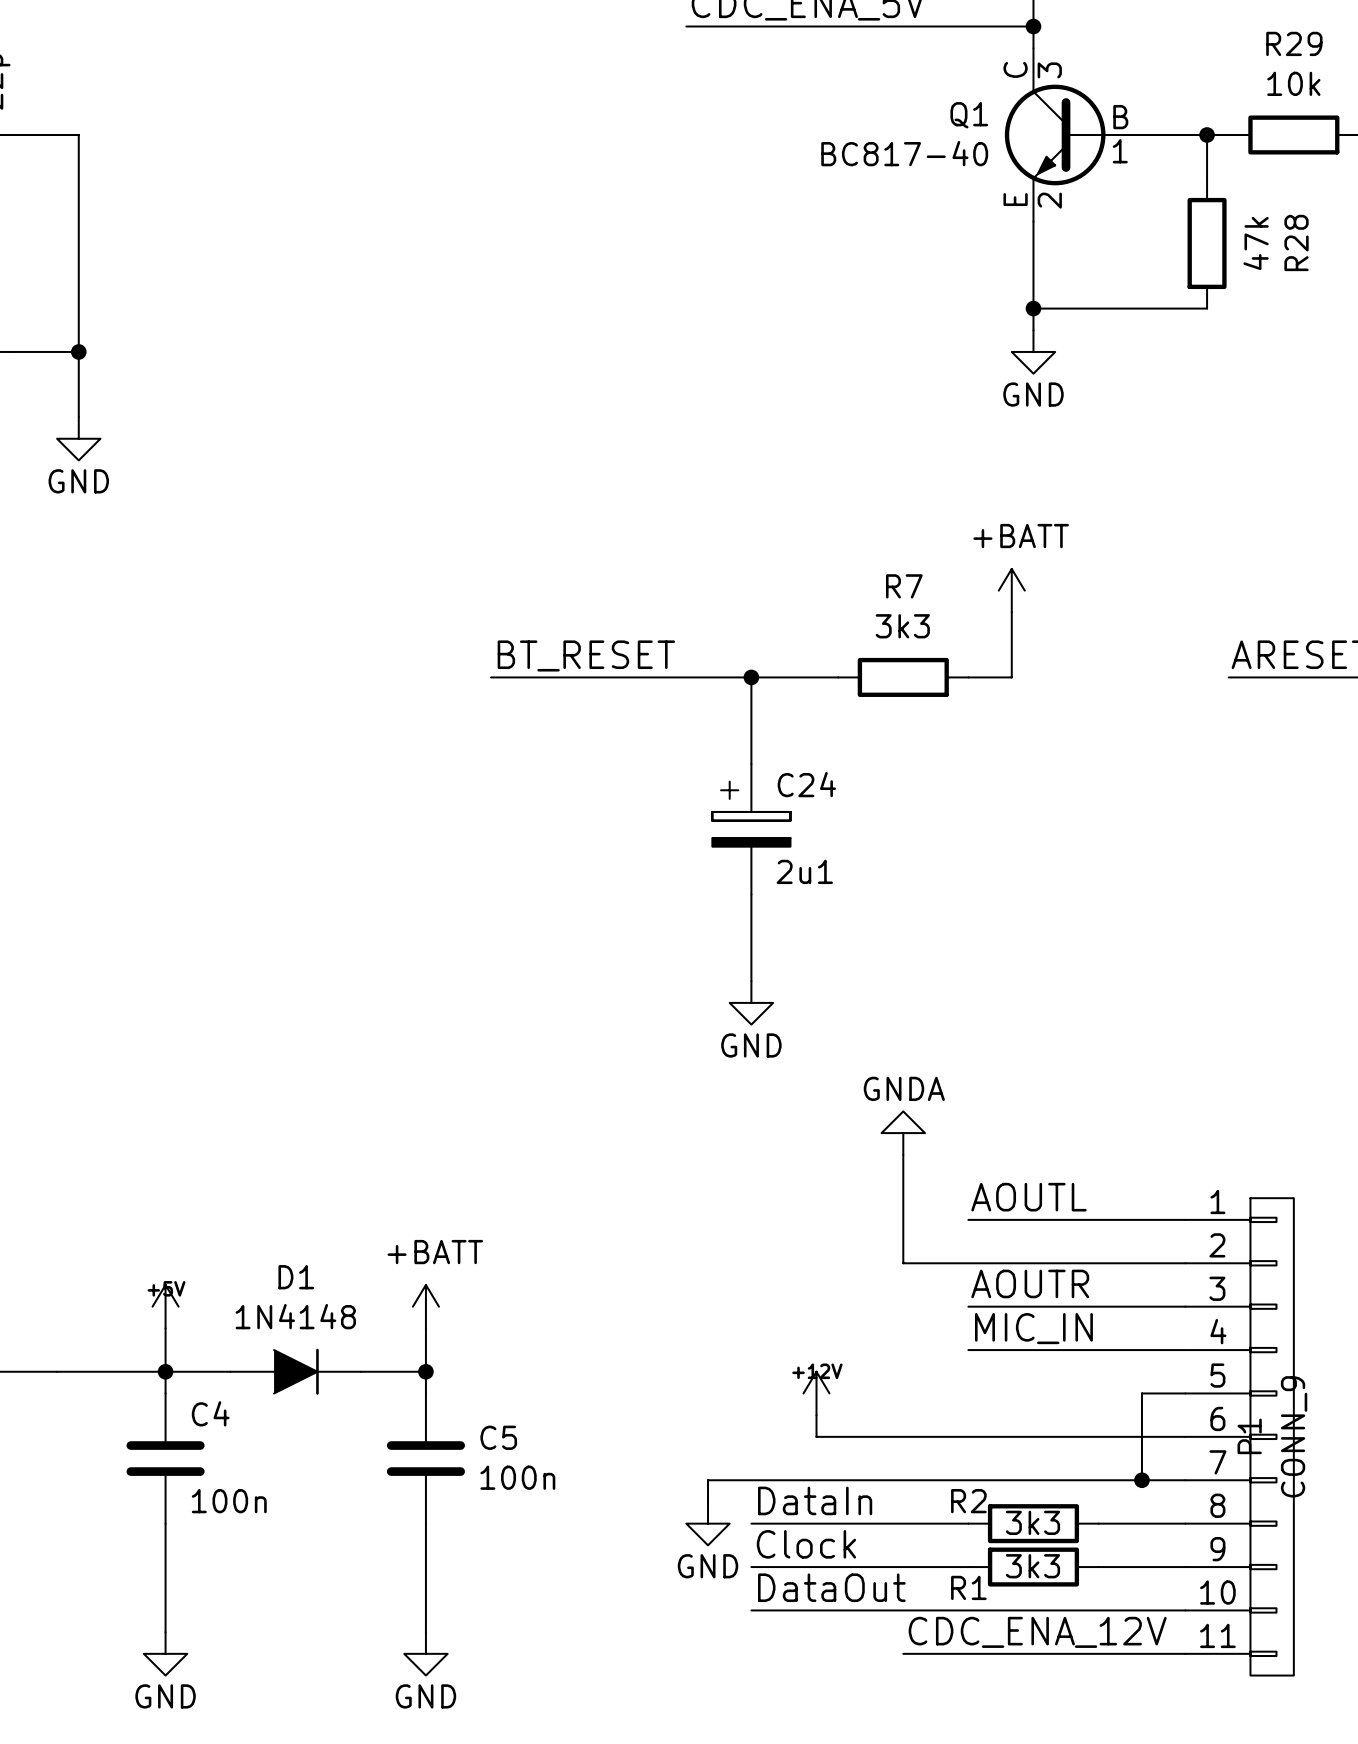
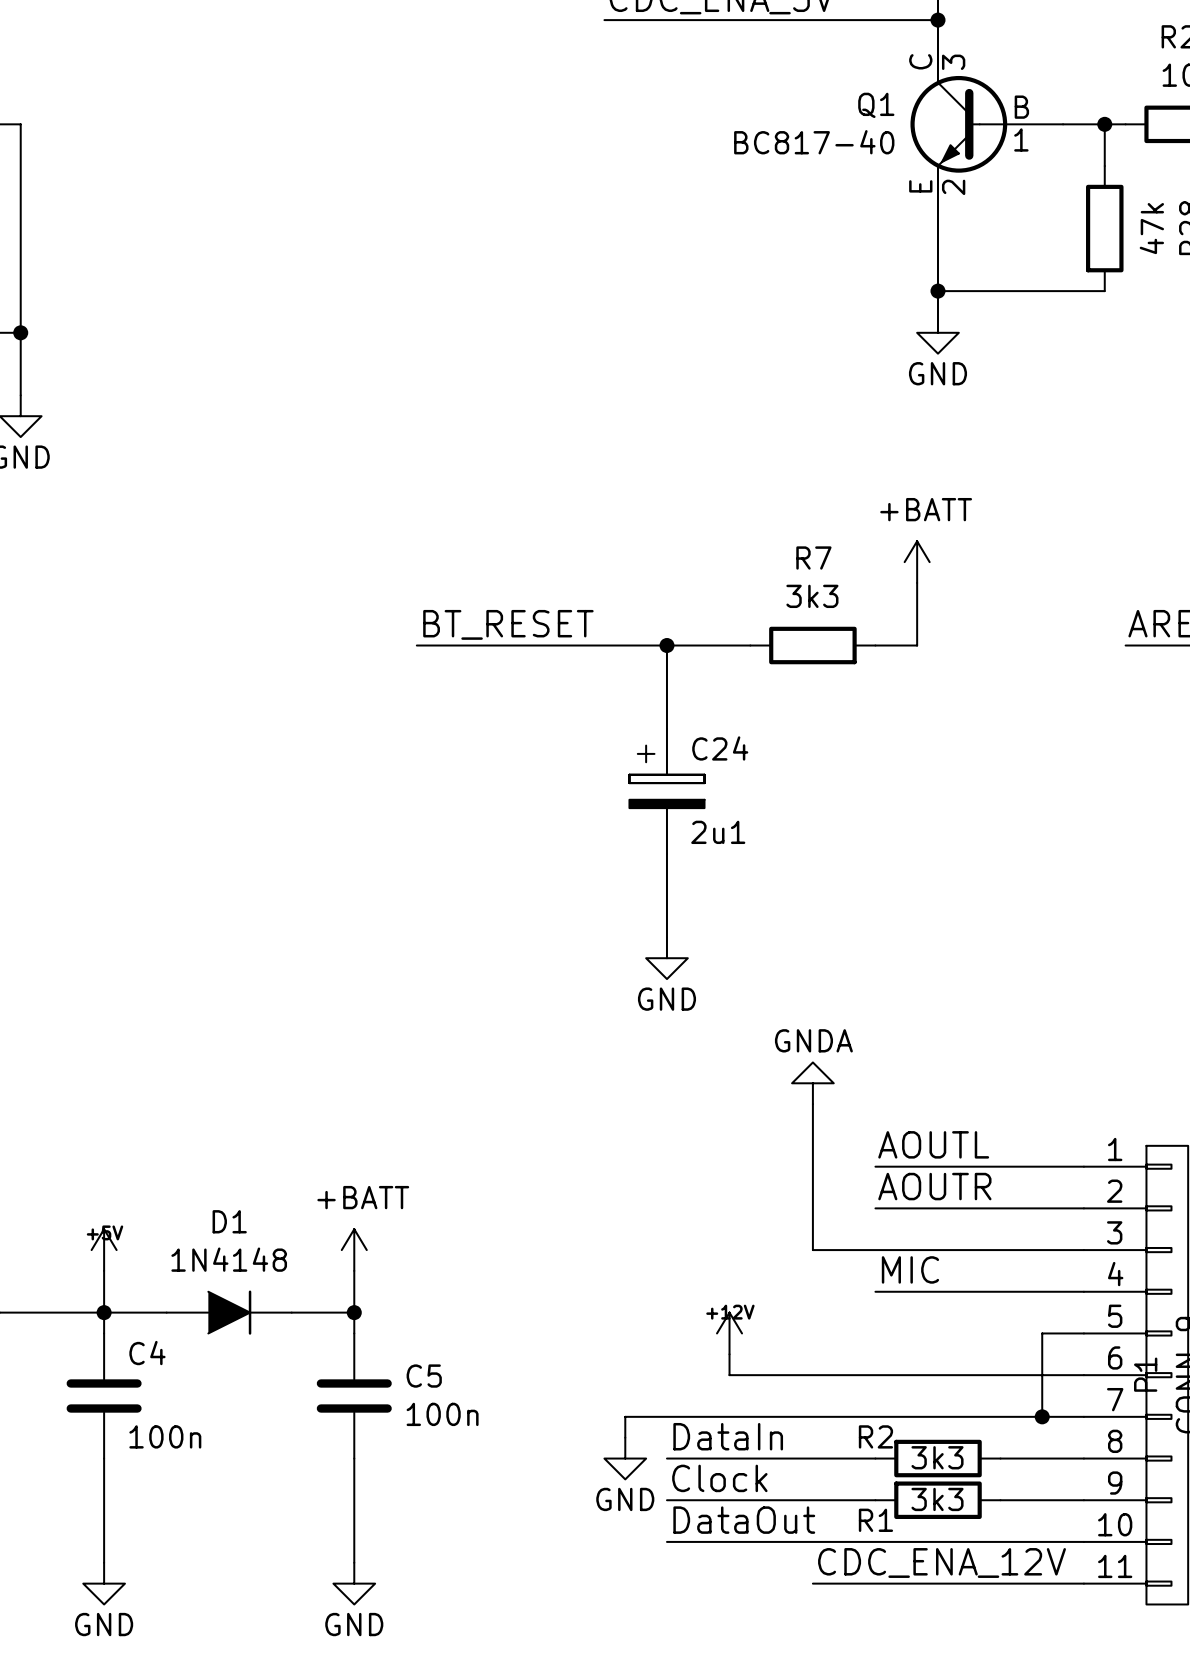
wire: (903, 1263) (968, 1263) -> (812, 1208) (812, 1250) (875, 1250)
label position: AOUTR (1030, 1283) -> AOUTR (934, 1186)
label: MIC_IN (1033, 1328) -> MIC (910, 1269)

